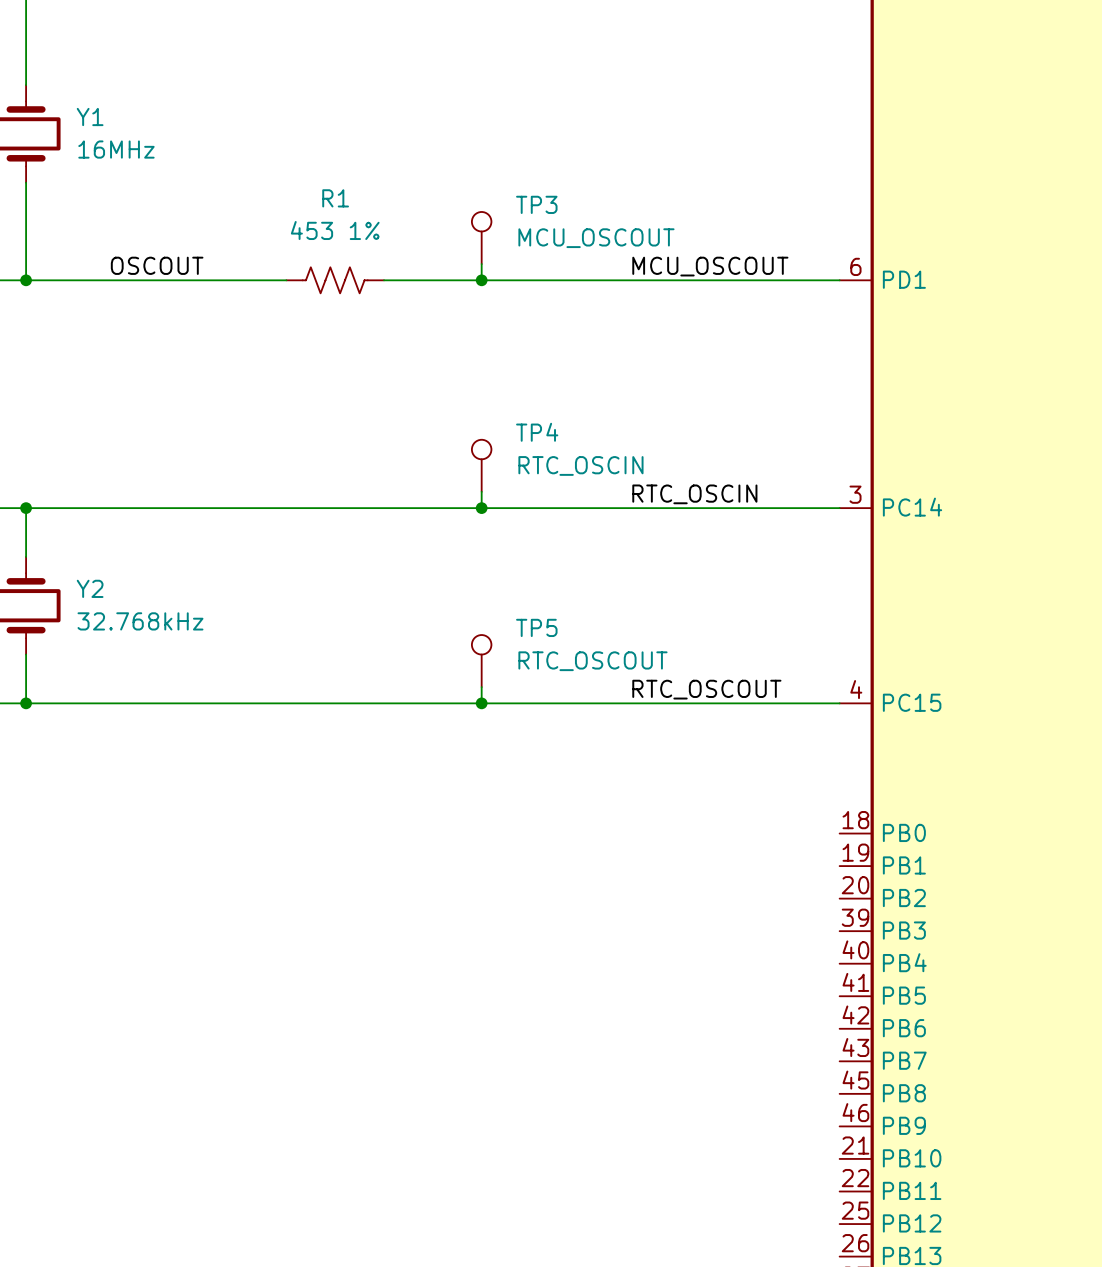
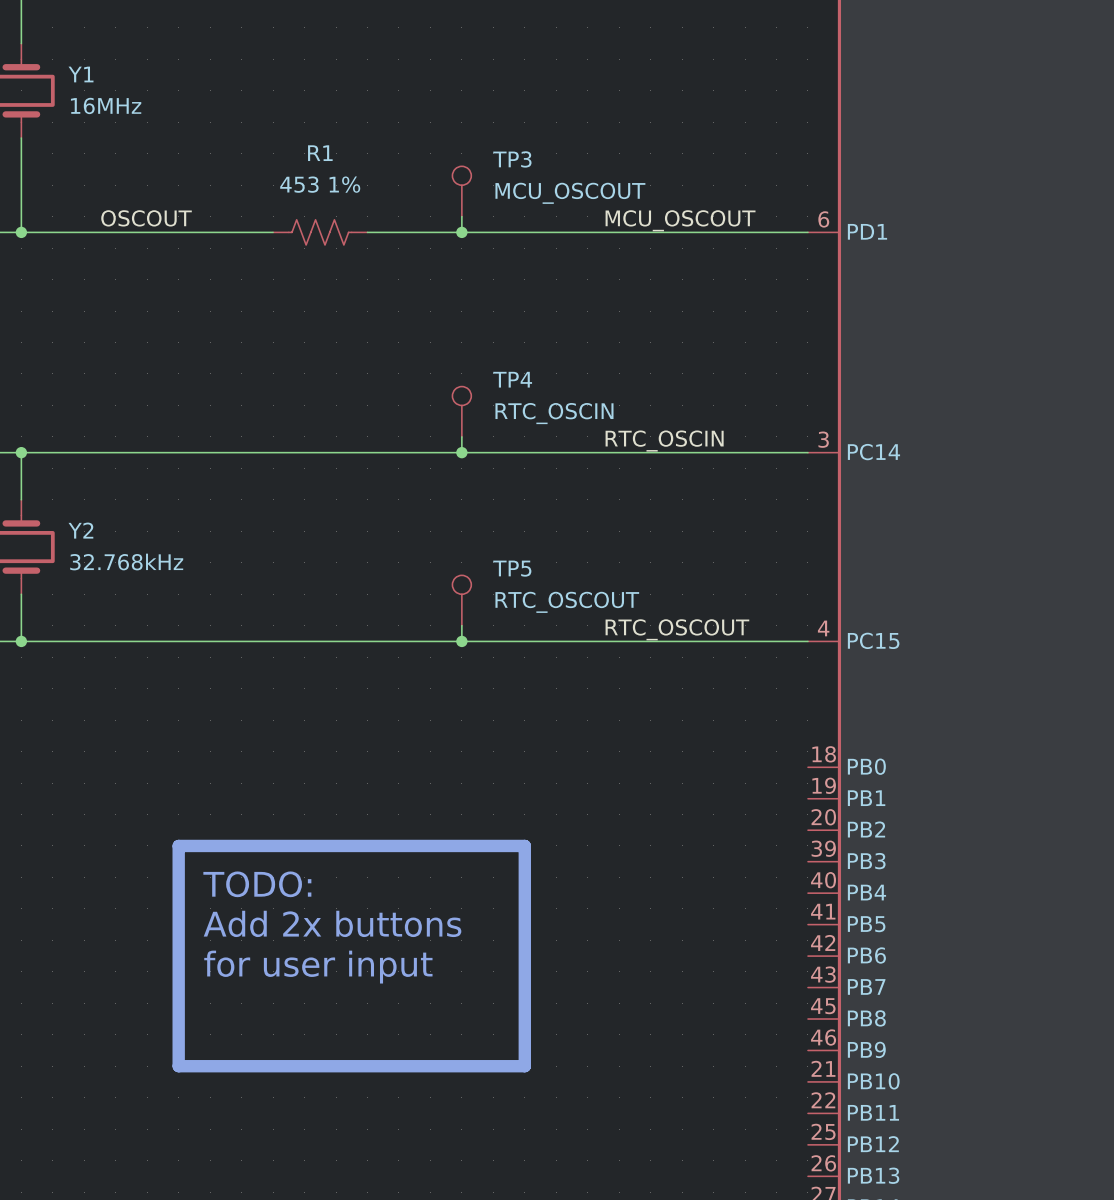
line: none -> (178, 845) (524, 845) (524, 1066) (178, 1066) (178, 845)
text: none -> TODO: (257, 884)
text: none -> Add 2x buttons (332, 923)
text: none -> for user input (318, 967)

